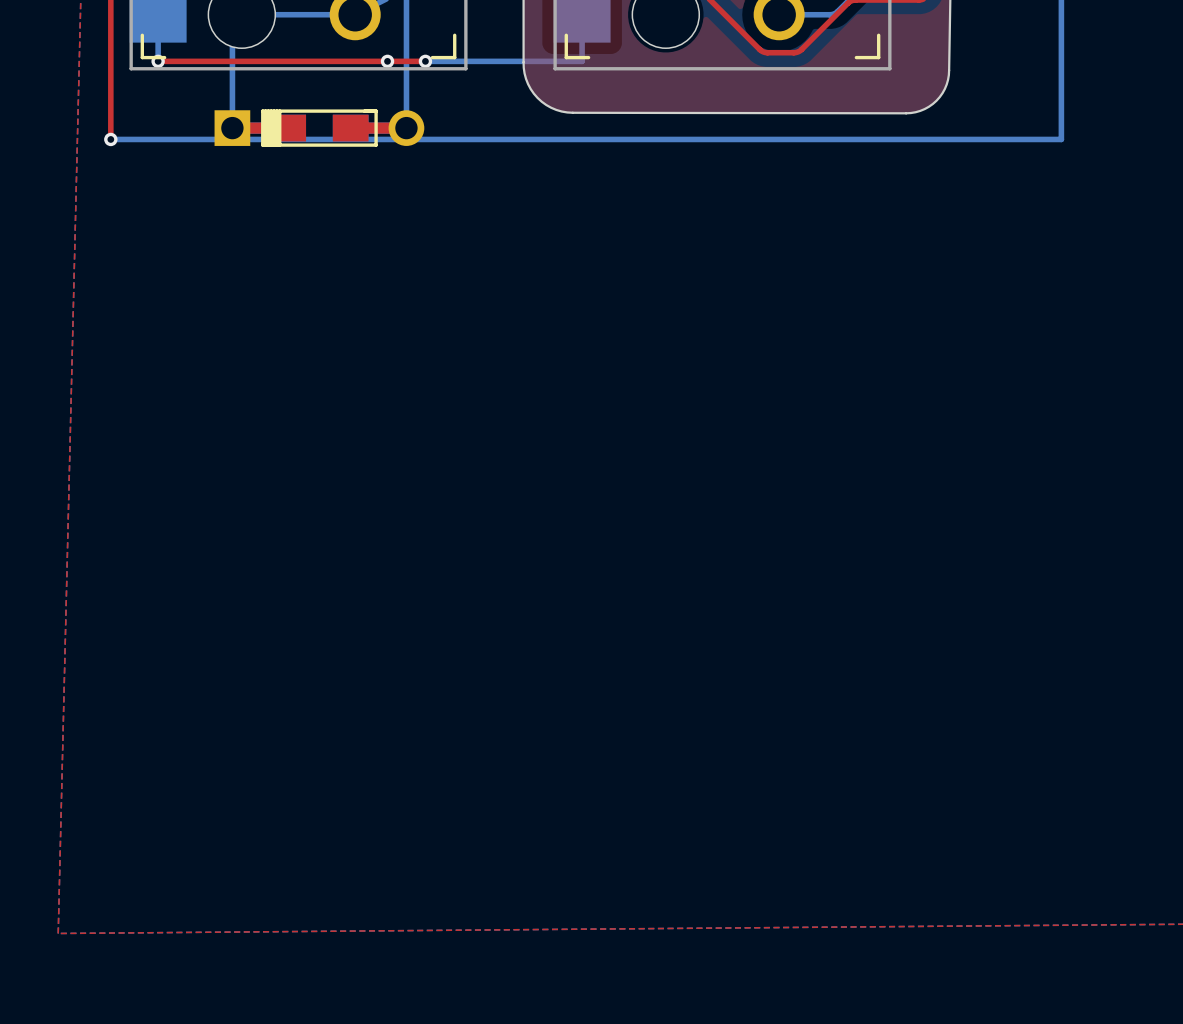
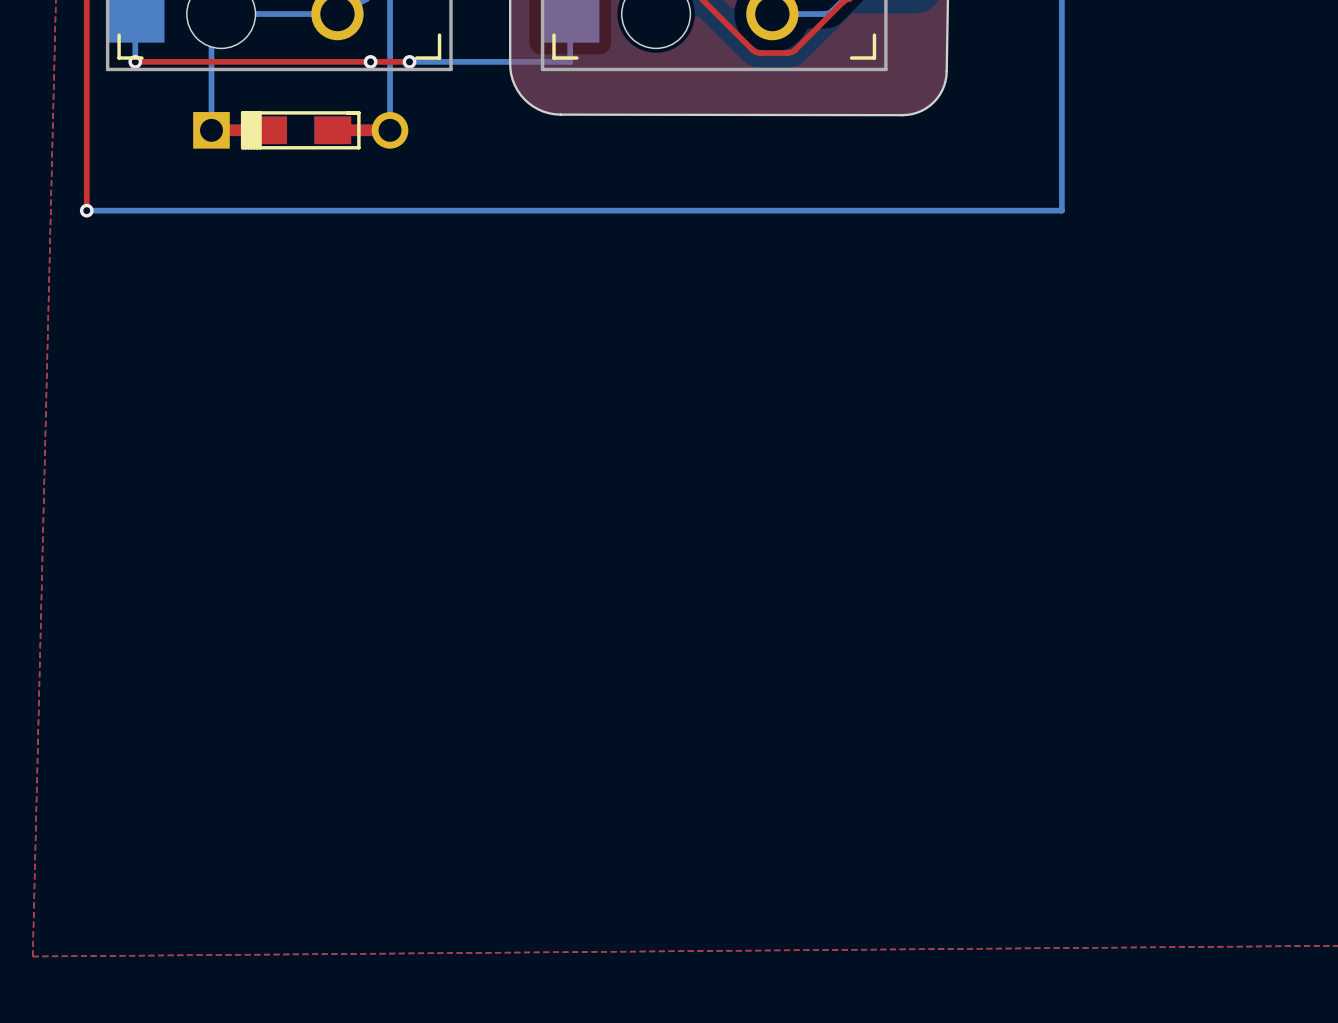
bottom track: (110, 139) (1061, 139) -> (86, 210) (1061, 210) (1061, 141)
top track: none -> (86, 141) (86, 210)
via position: (110, 139) -> (86, 210)

